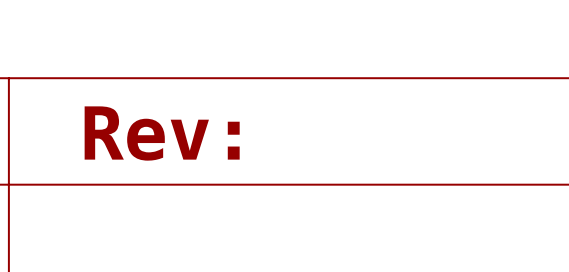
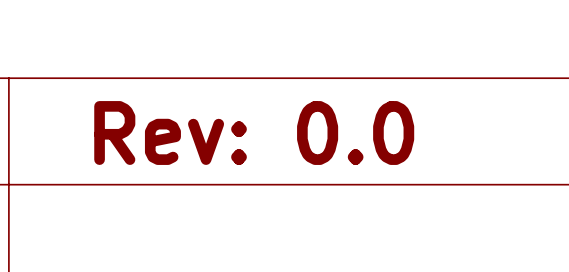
title block: Rev: (162, 133) -> Rev: 0.0 (254, 133)

